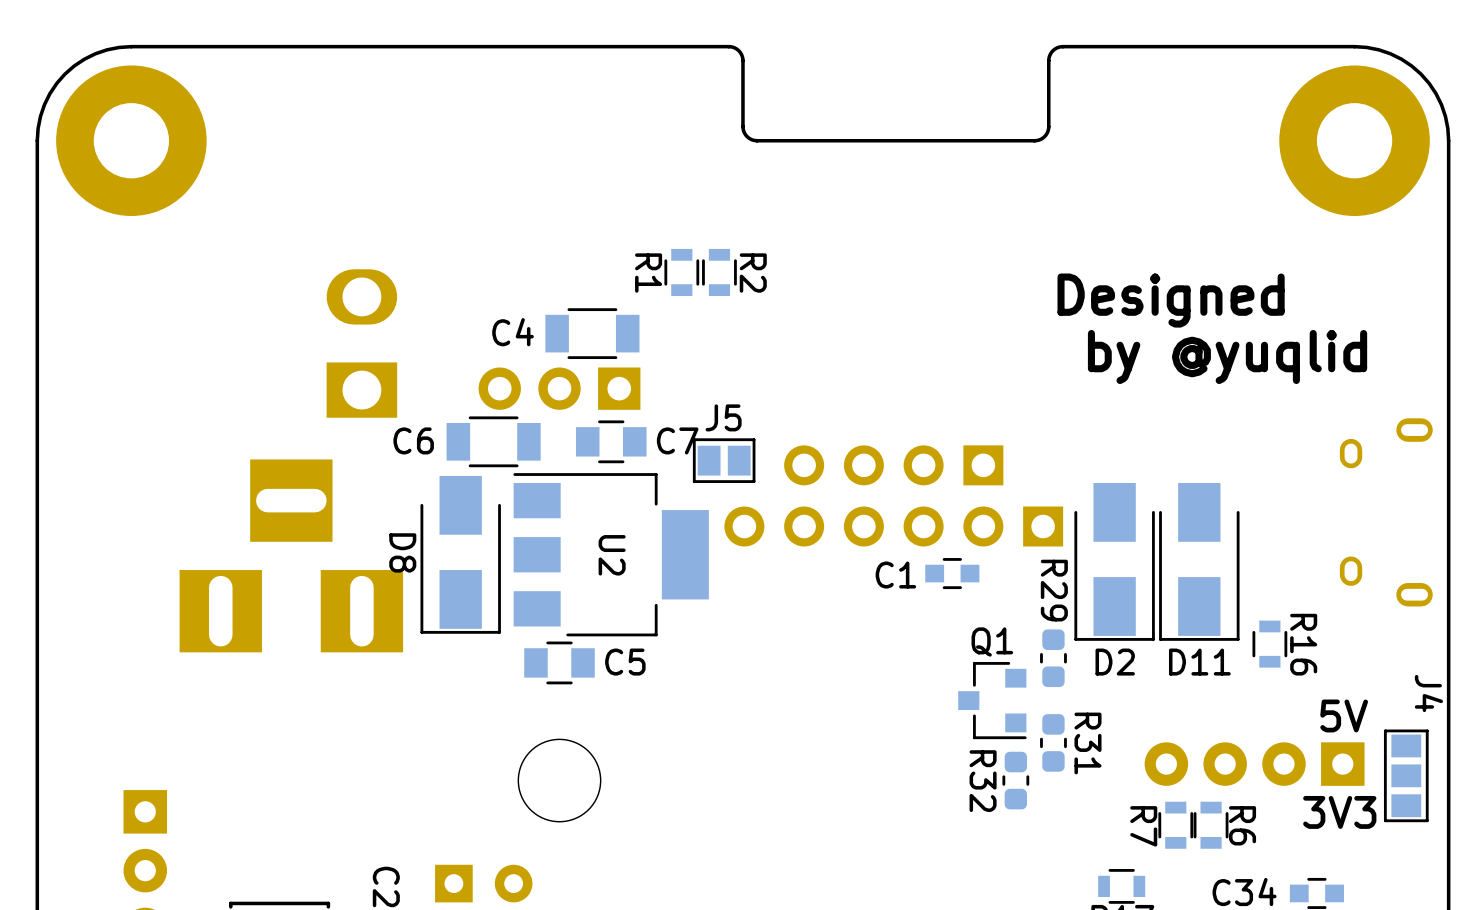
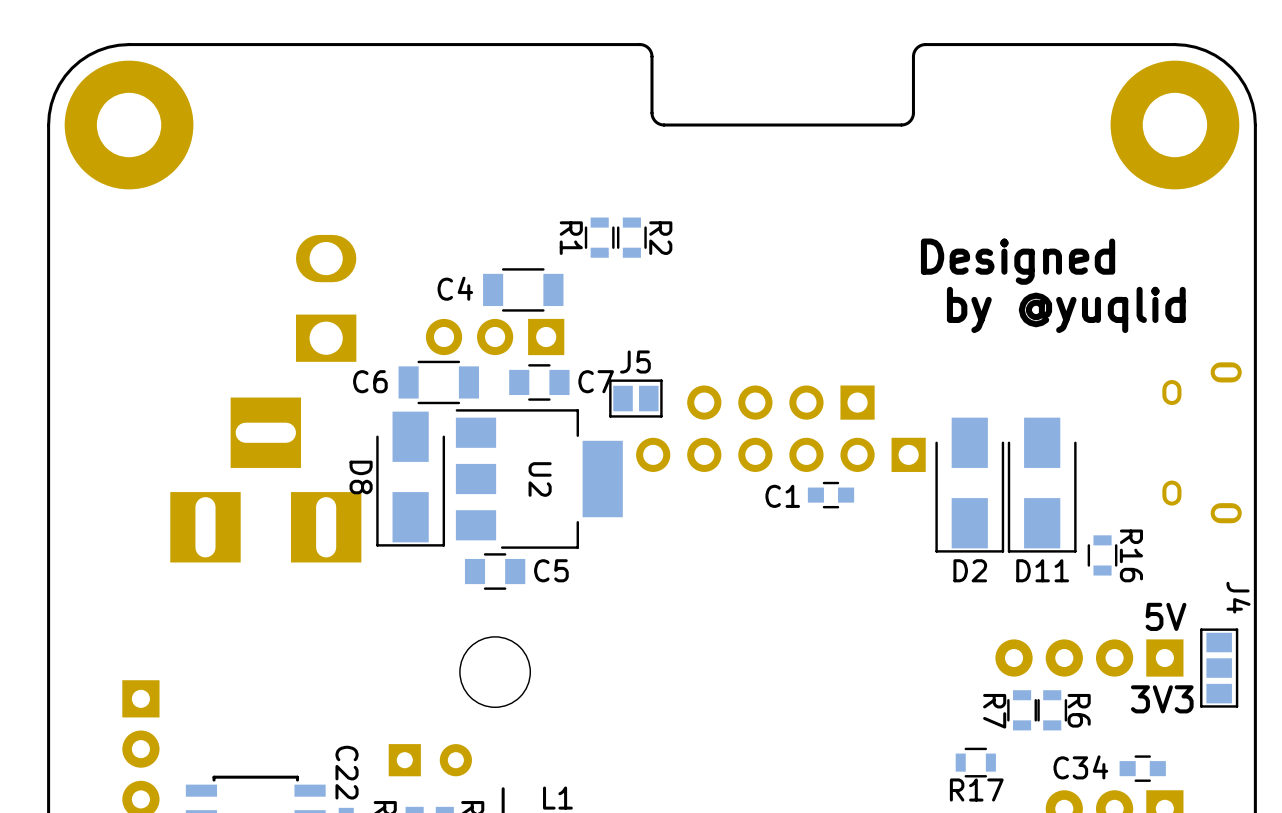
R29: (1053, 658) -> none
Q1: (992, 700) -> none
R31: (1053, 742) -> none
R32: (1015, 780) -> none

